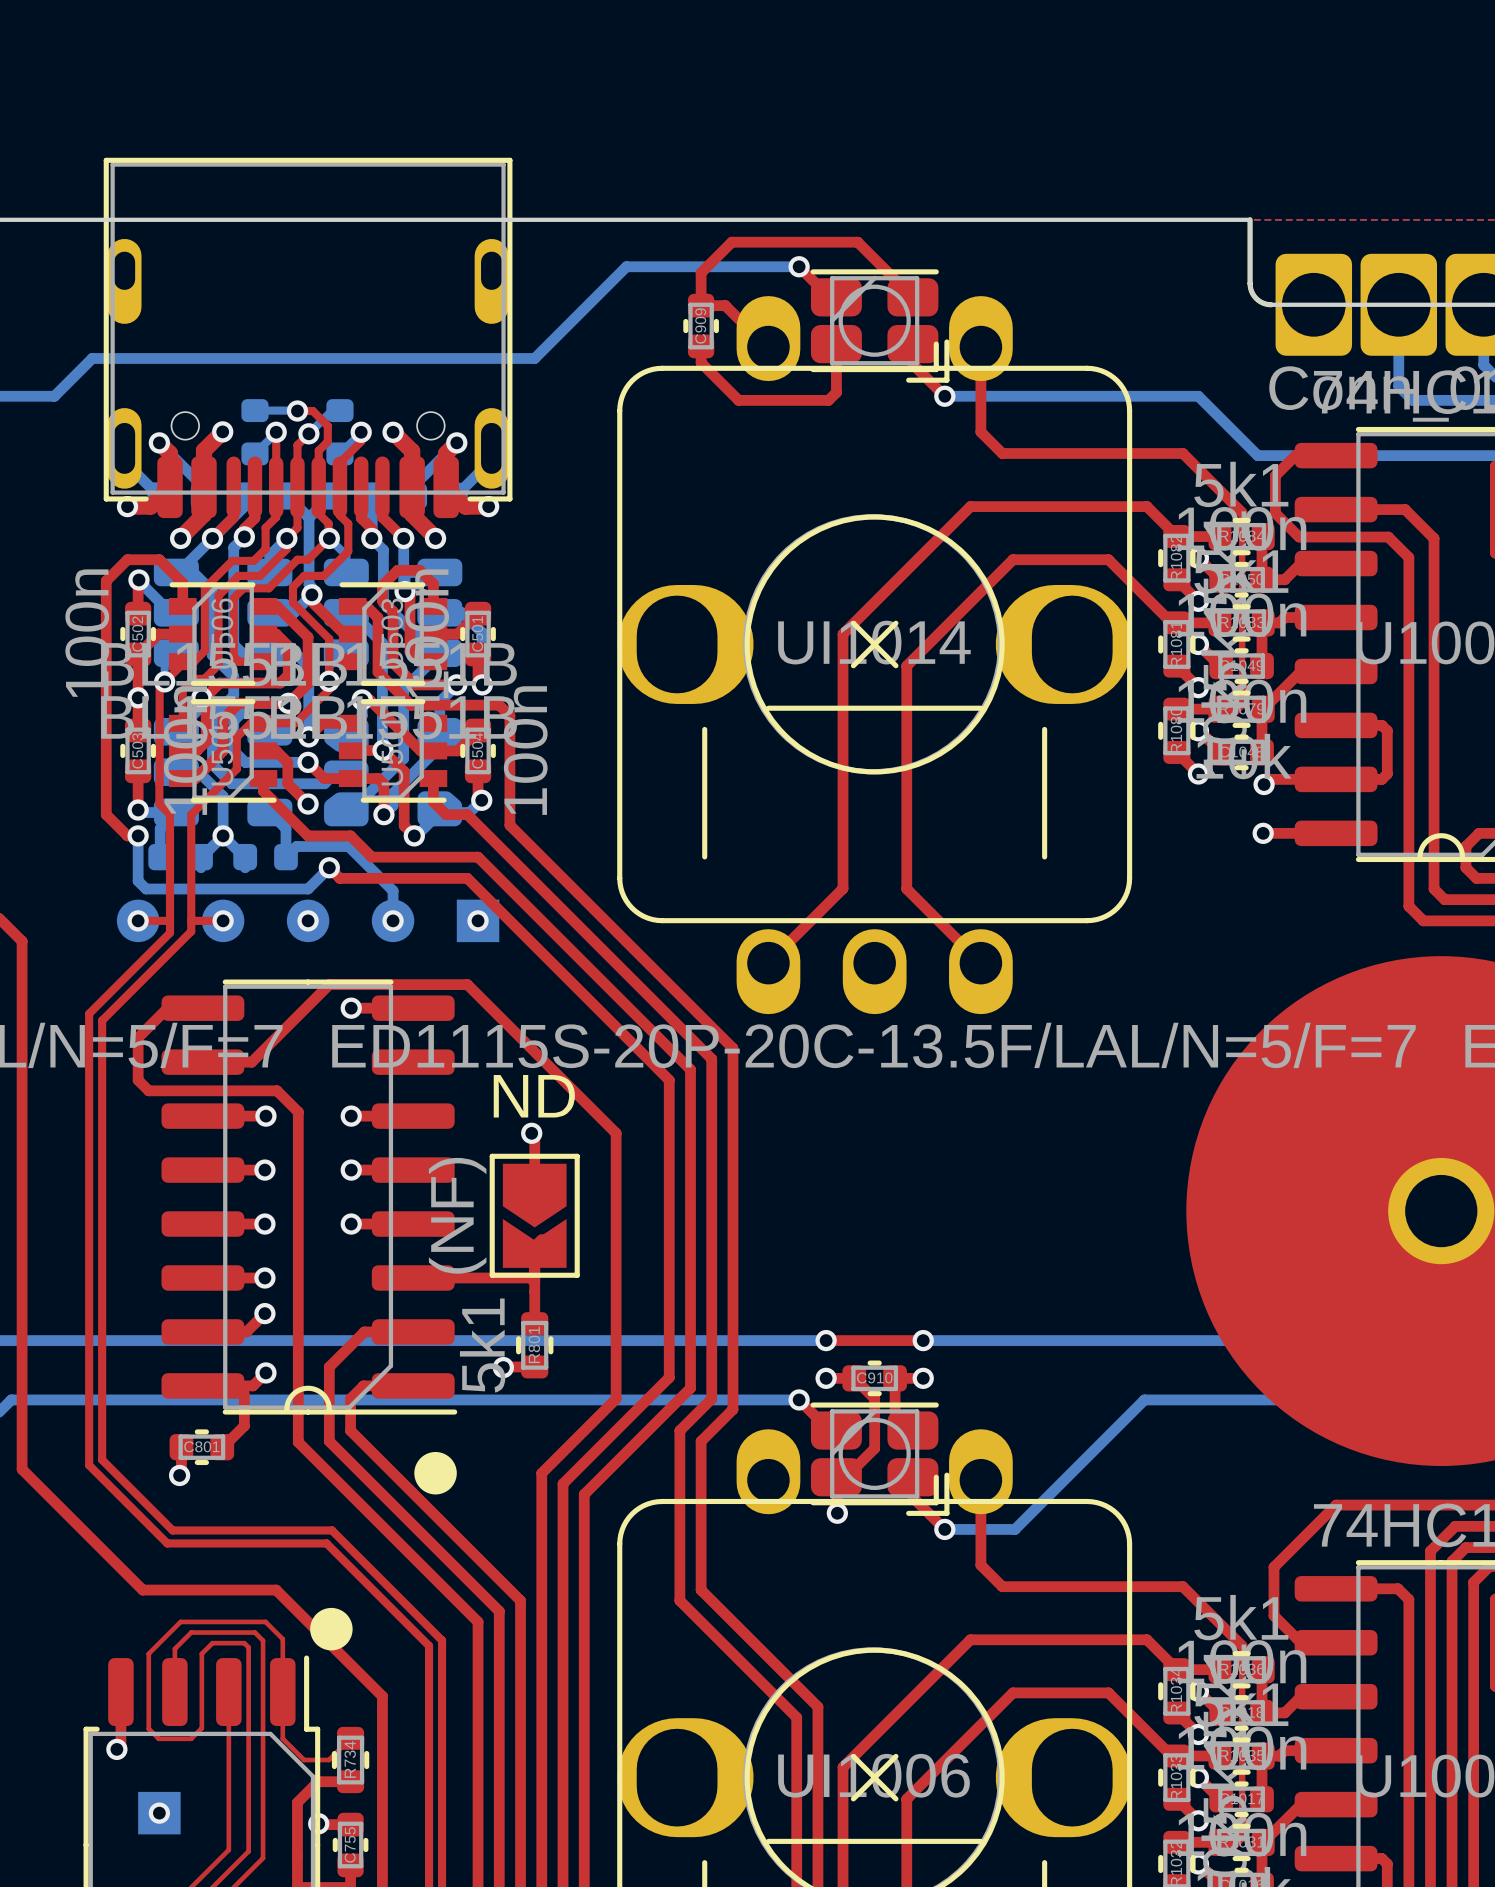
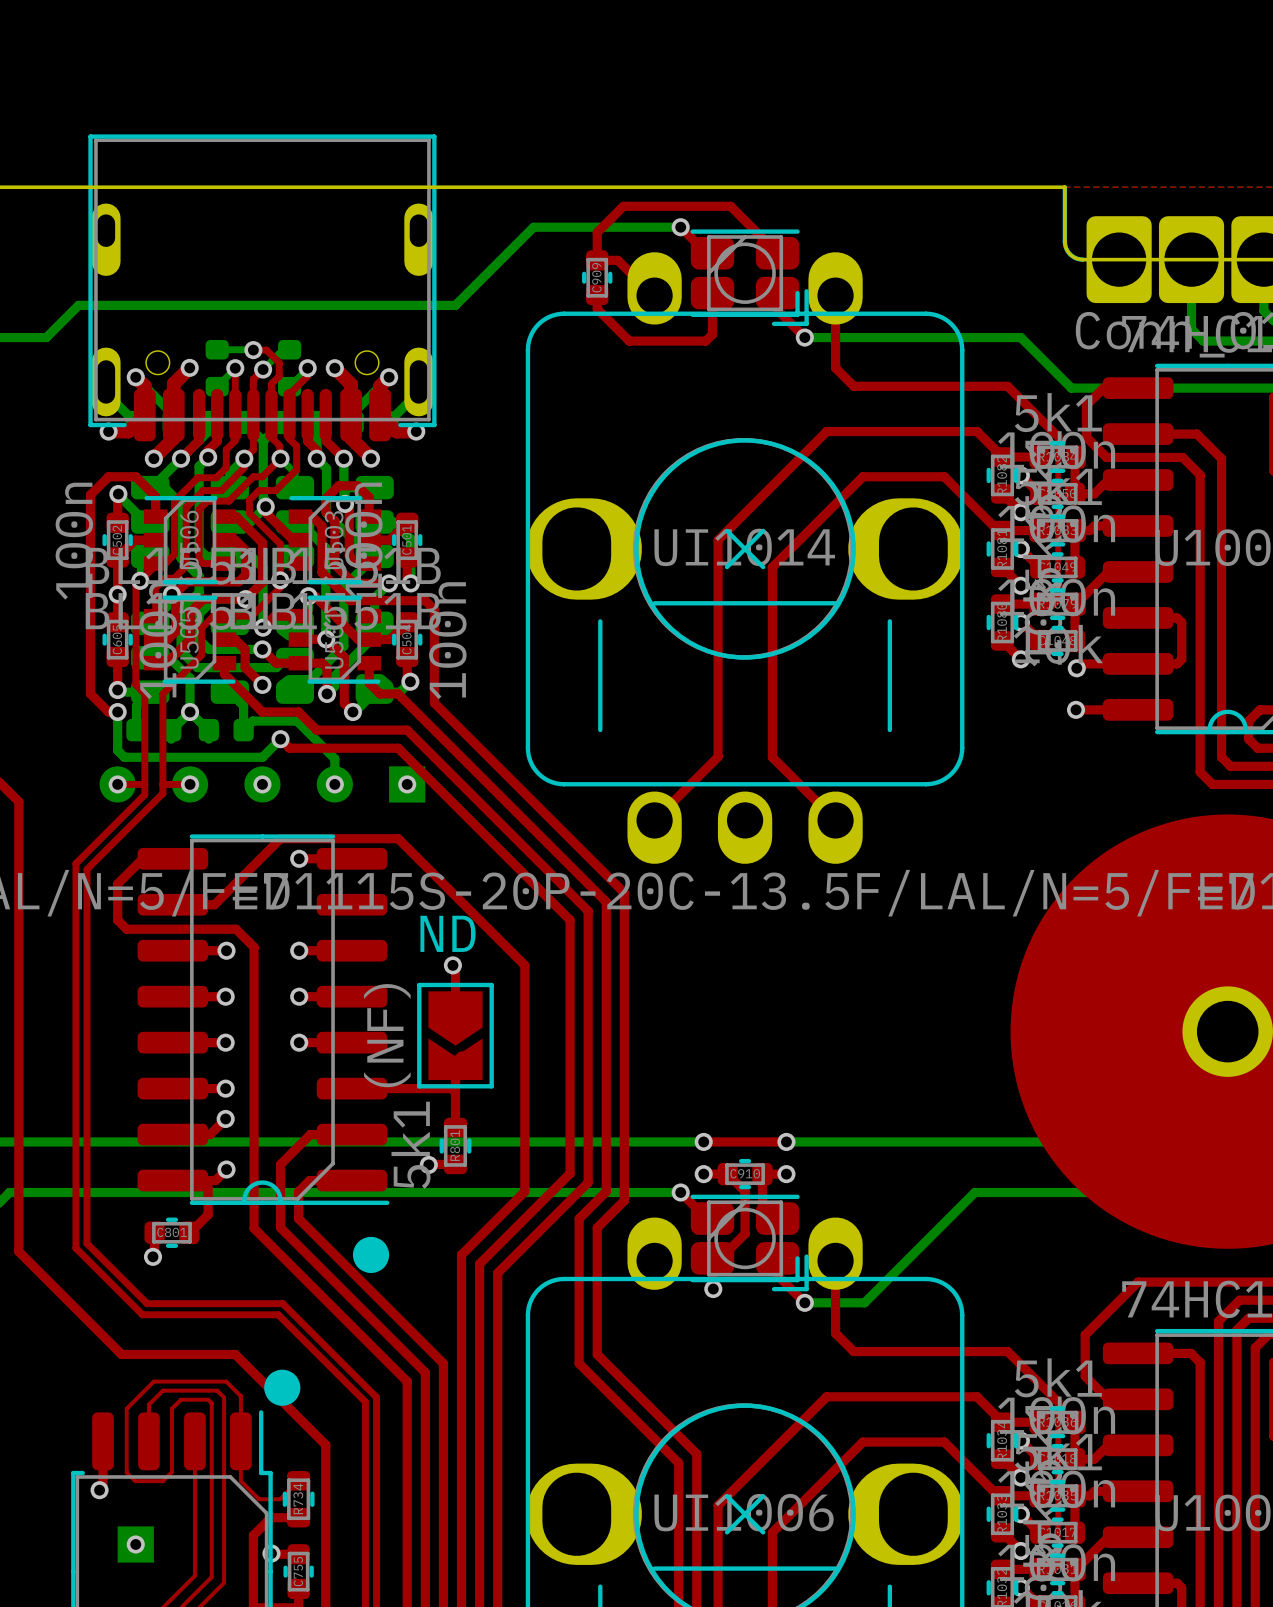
C503 name: C503 (137, 750) -> C605 (117, 639)

